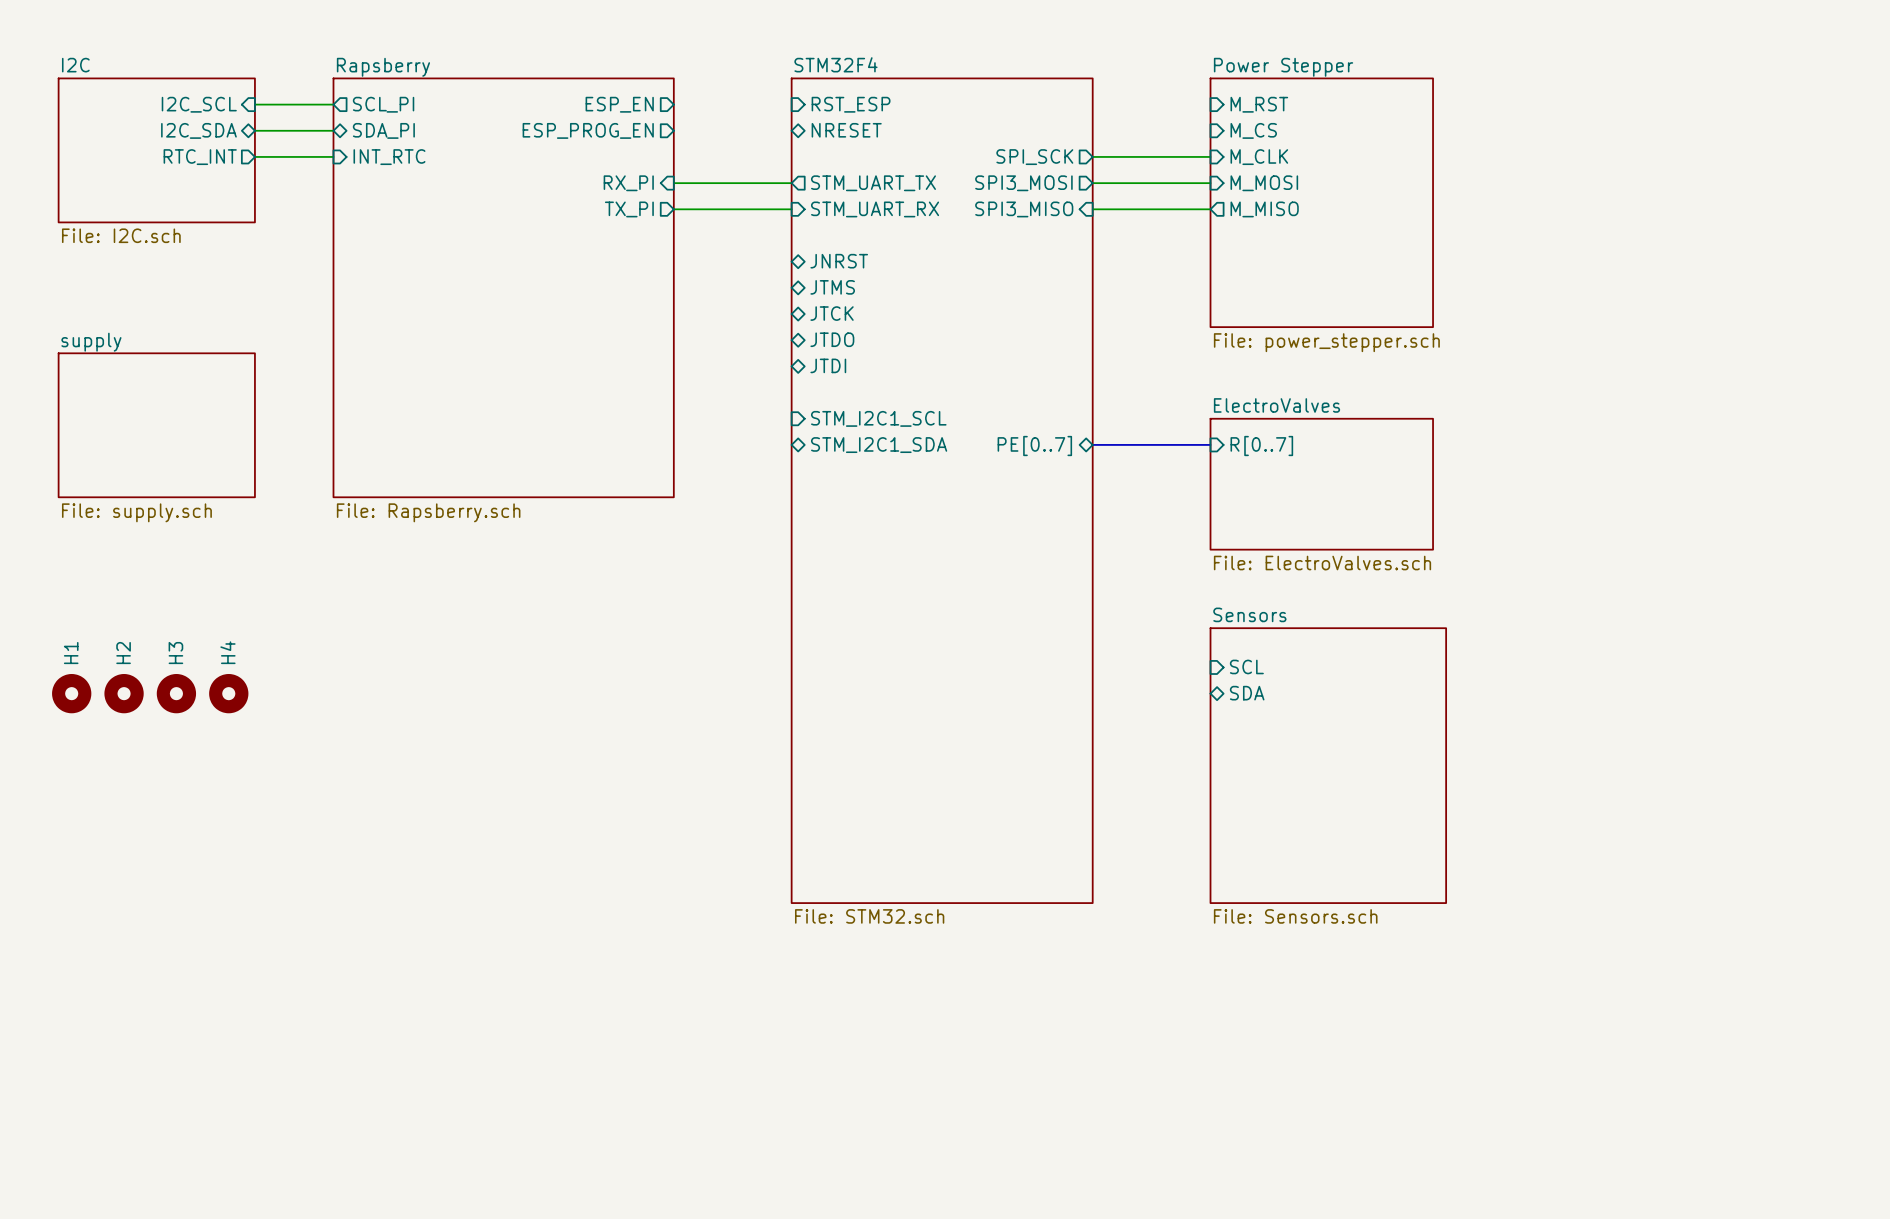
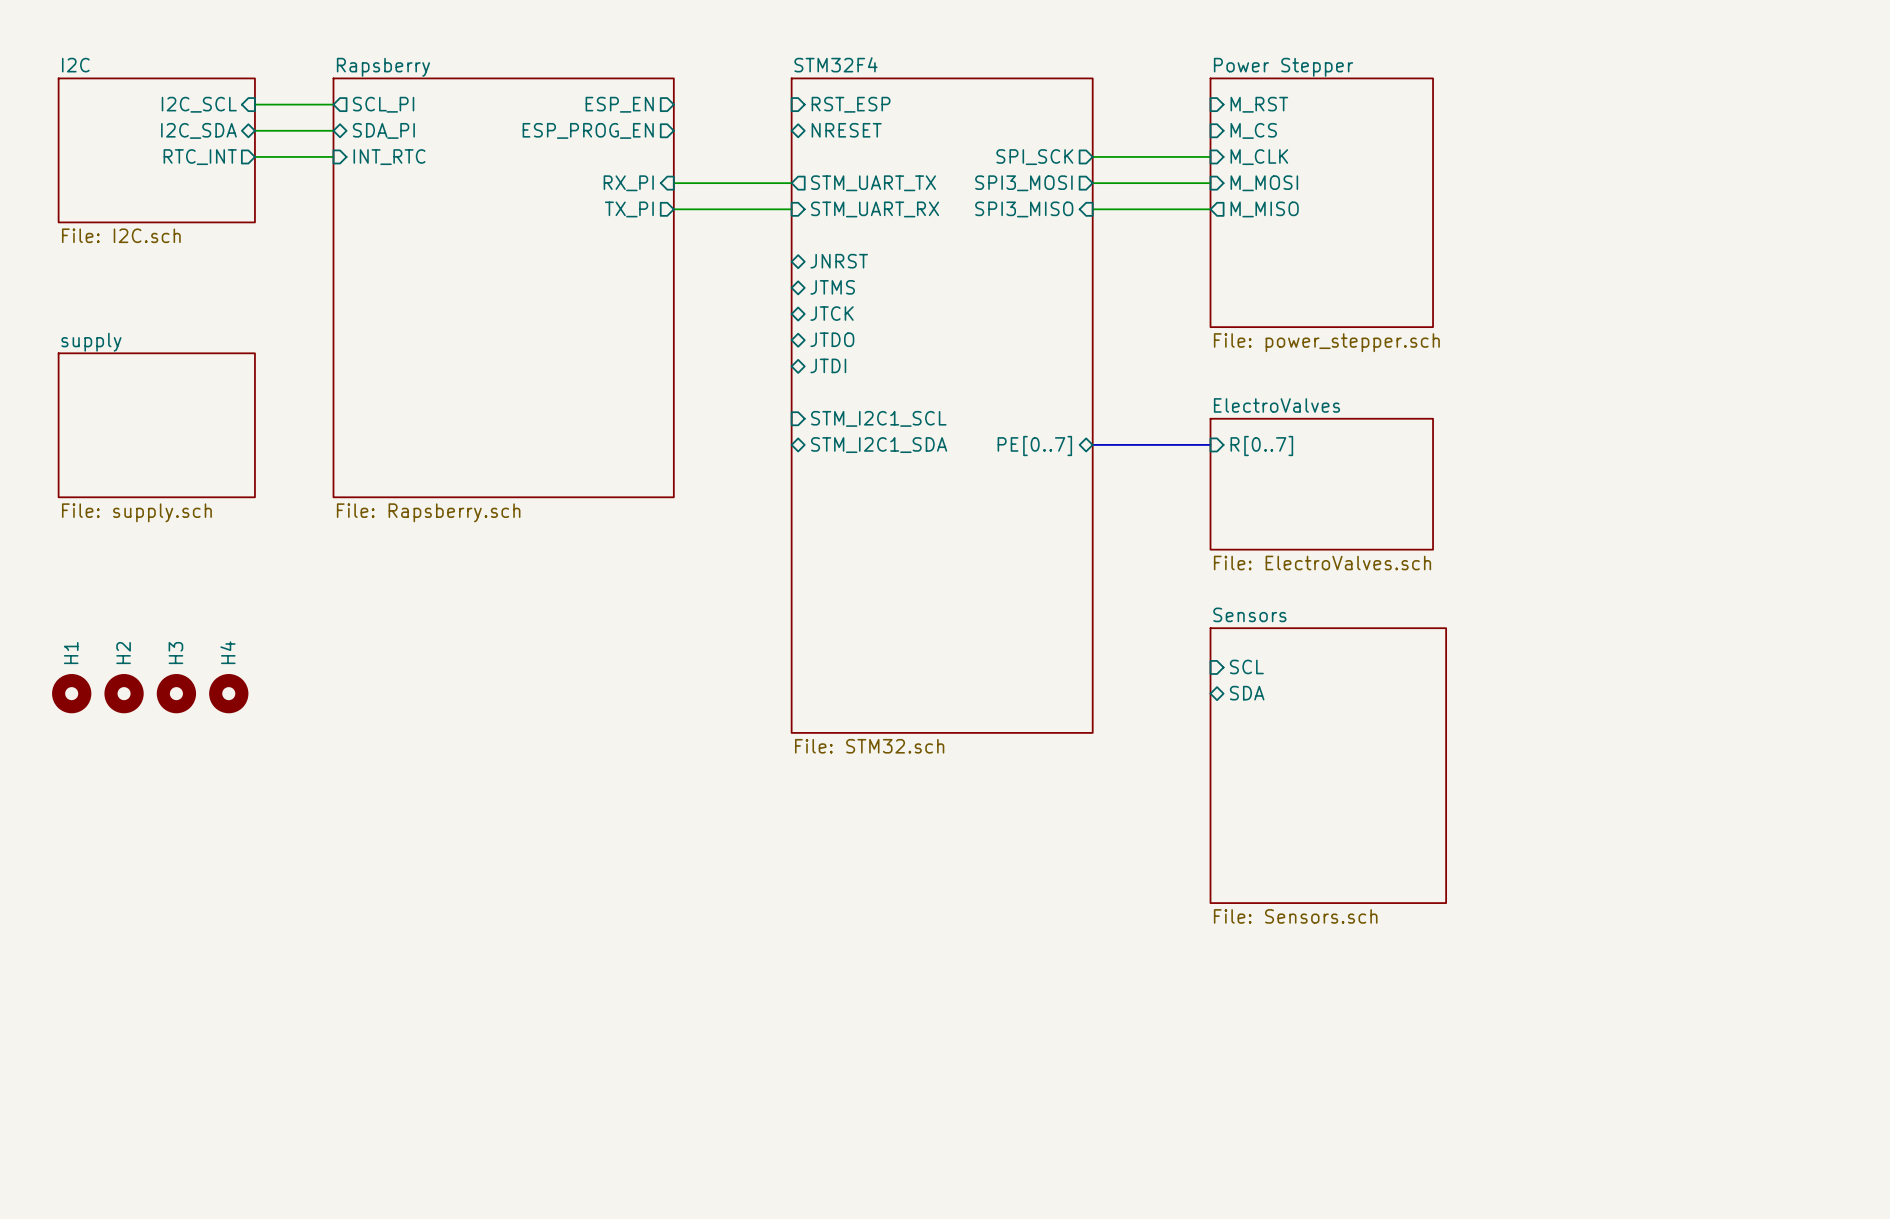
sheet STM32F4 shape: [791, 78, 1093, 904] -> [791, 78, 1093, 733]
sheet STM32F4 value position: File: STM32.sch (869, 916) -> File: STM32.sch (869, 746)

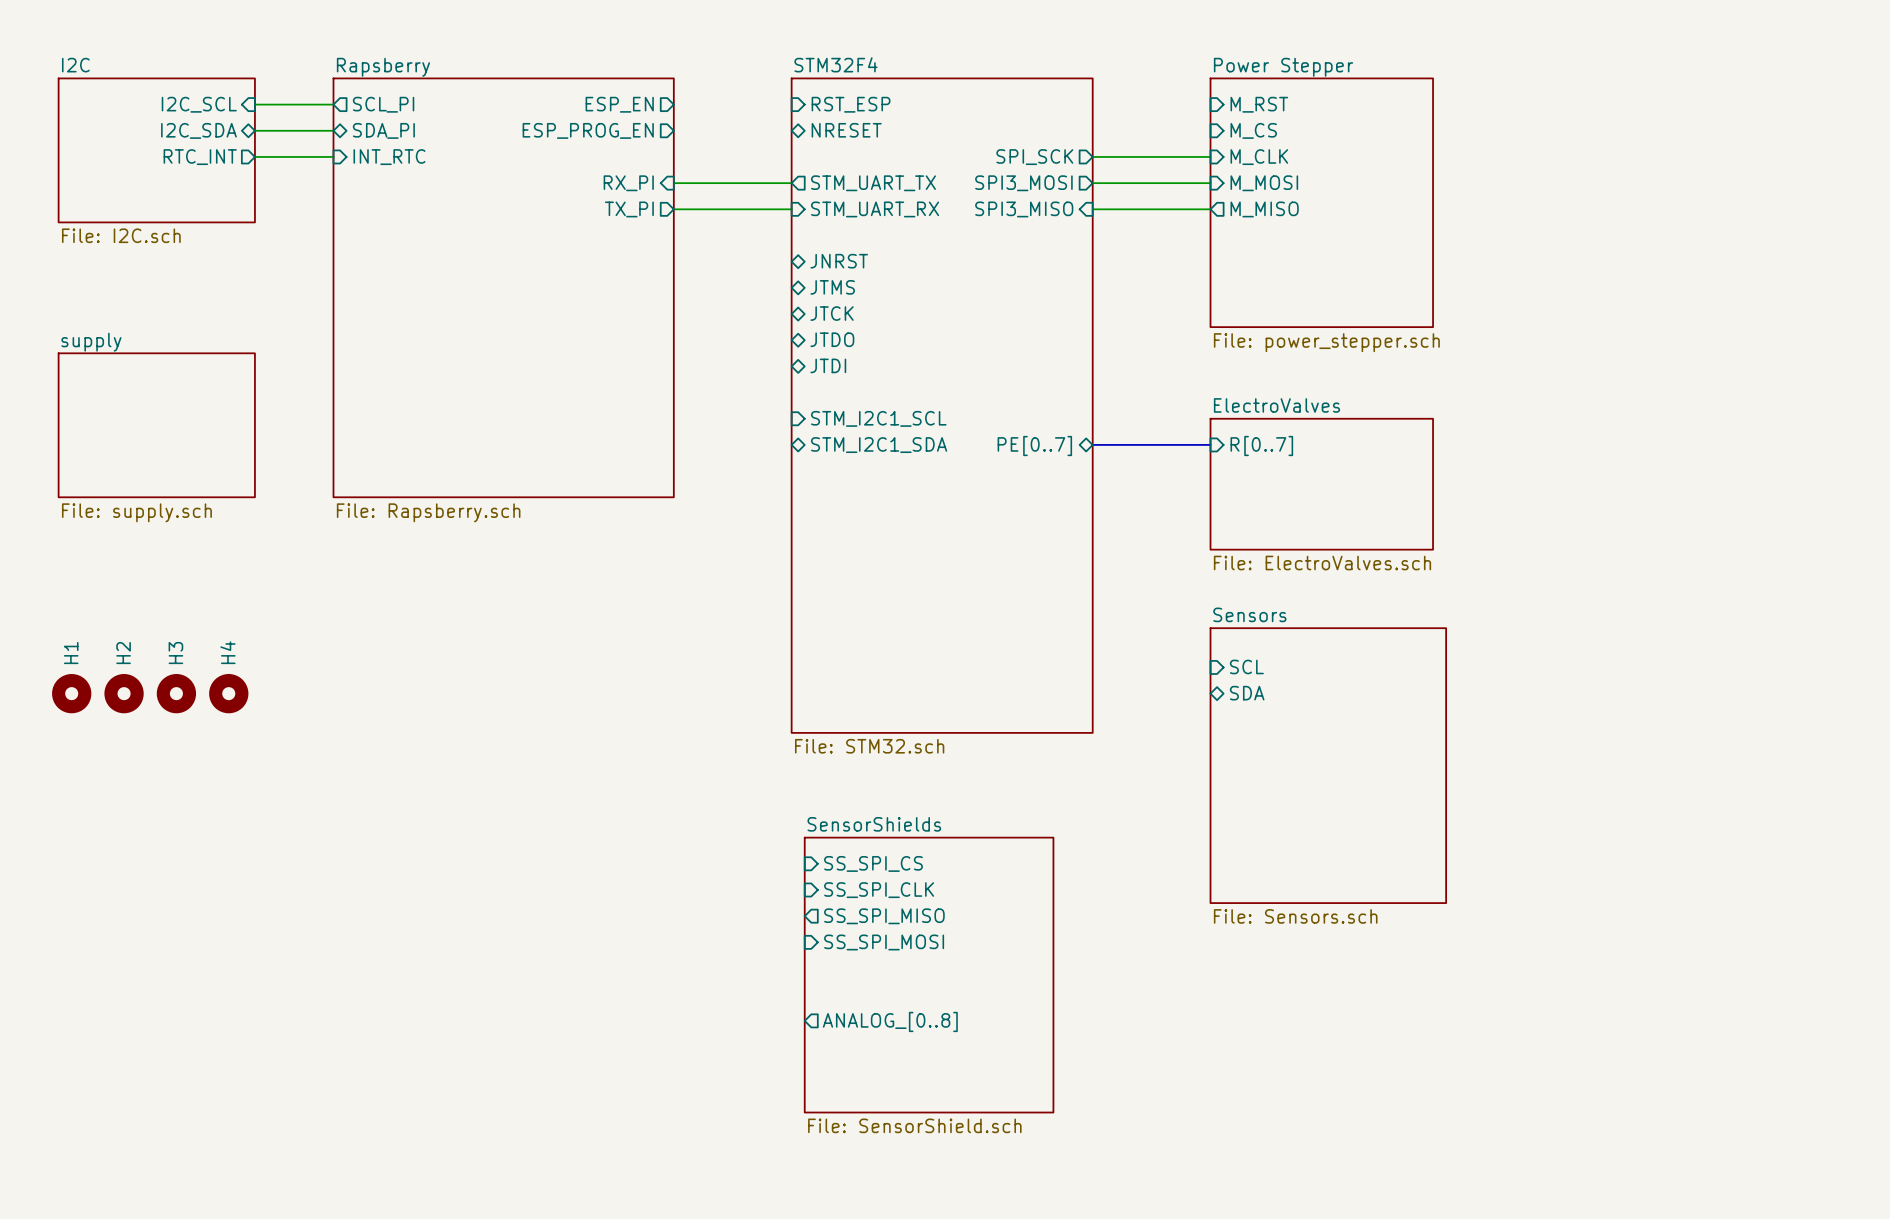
sheet pin: none -> SS_SPI_CS (873, 863)
sheet pin: none -> SS_SPI_CLK (879, 890)
sheet pin: none -> SS_SPI_MISO (884, 916)
sheet pin: none -> SS_SPI_MOSI (884, 942)
sheet SensorShields: none -> File: SensorShield.sch (929, 975)
sheet pin: none -> ANALOG_[0..8] (890, 1021)

